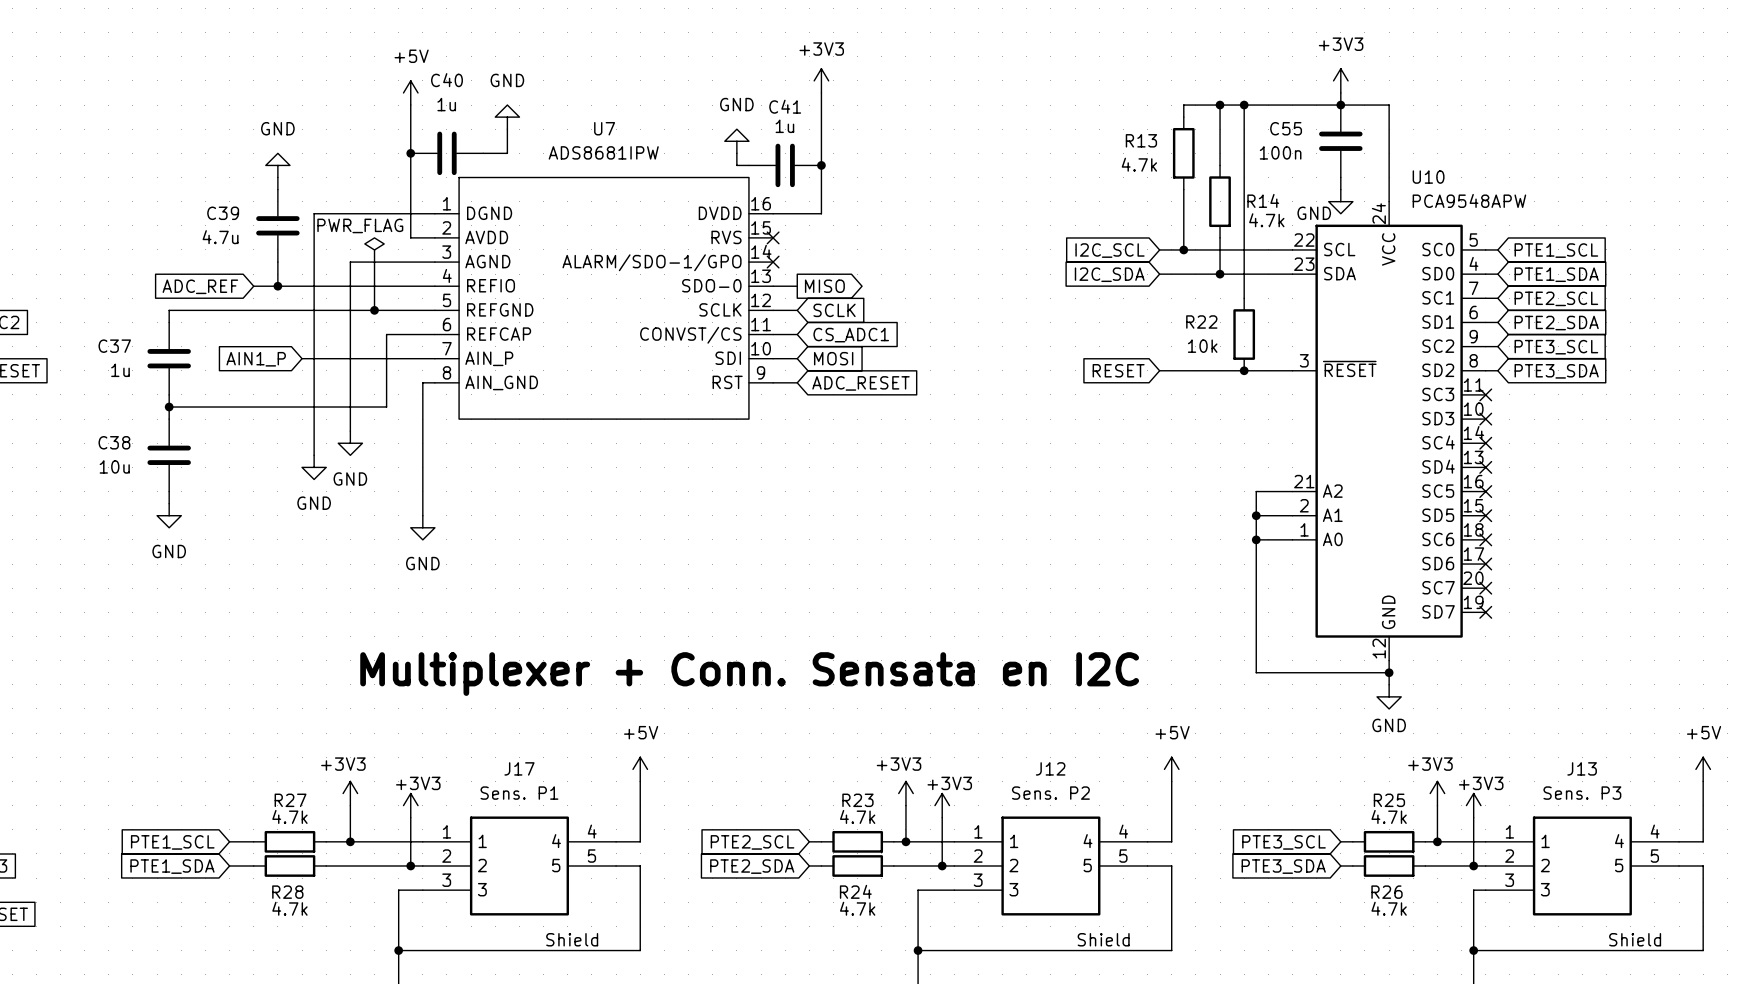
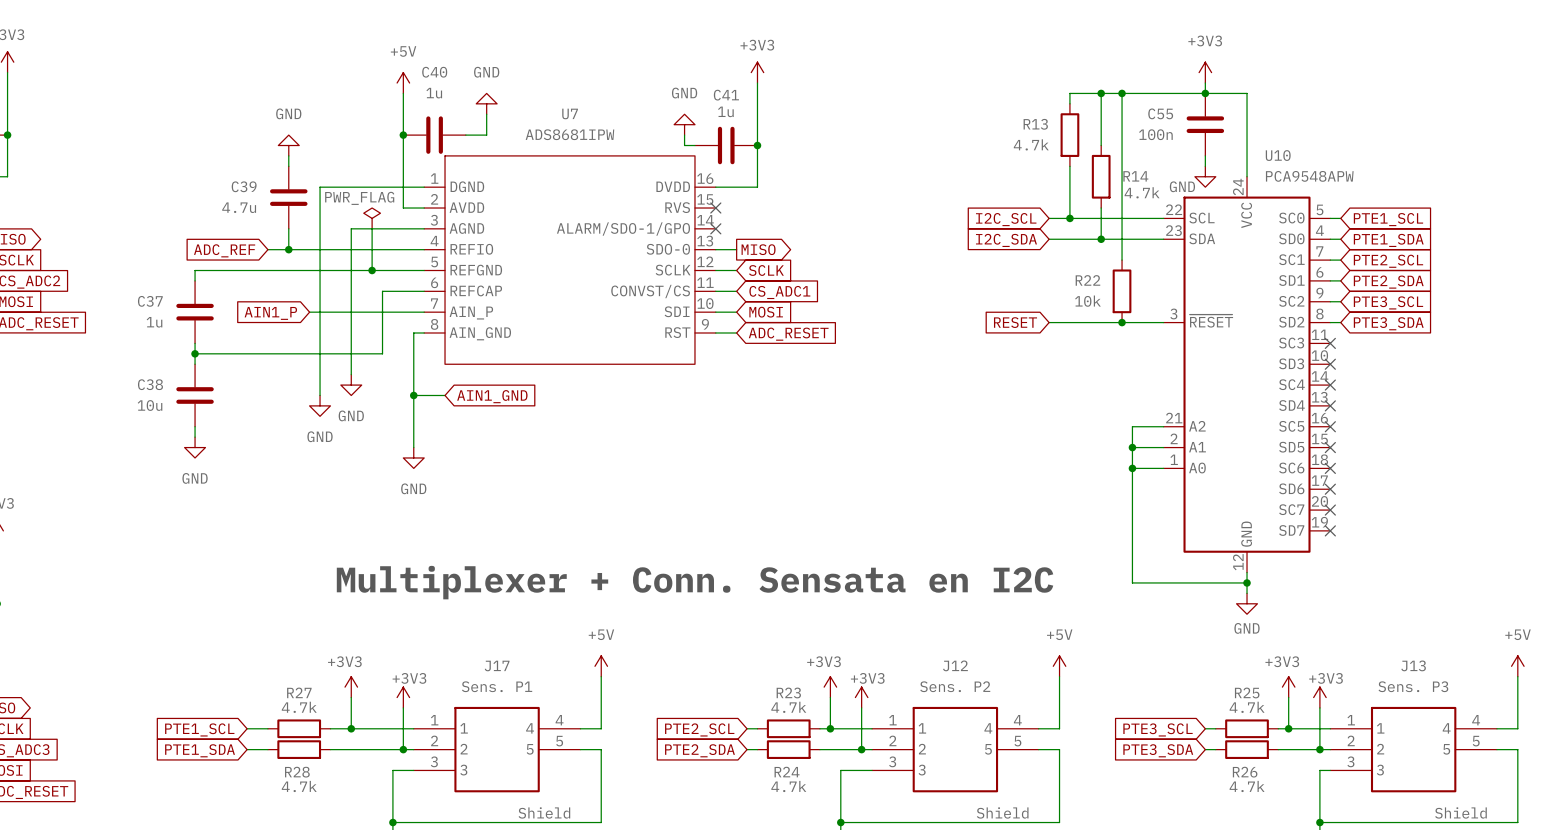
wire: none -> (413, 395) (445, 395)
junction: none -> (413, 395)
global label: none -> AIN1_GND (492, 396)

